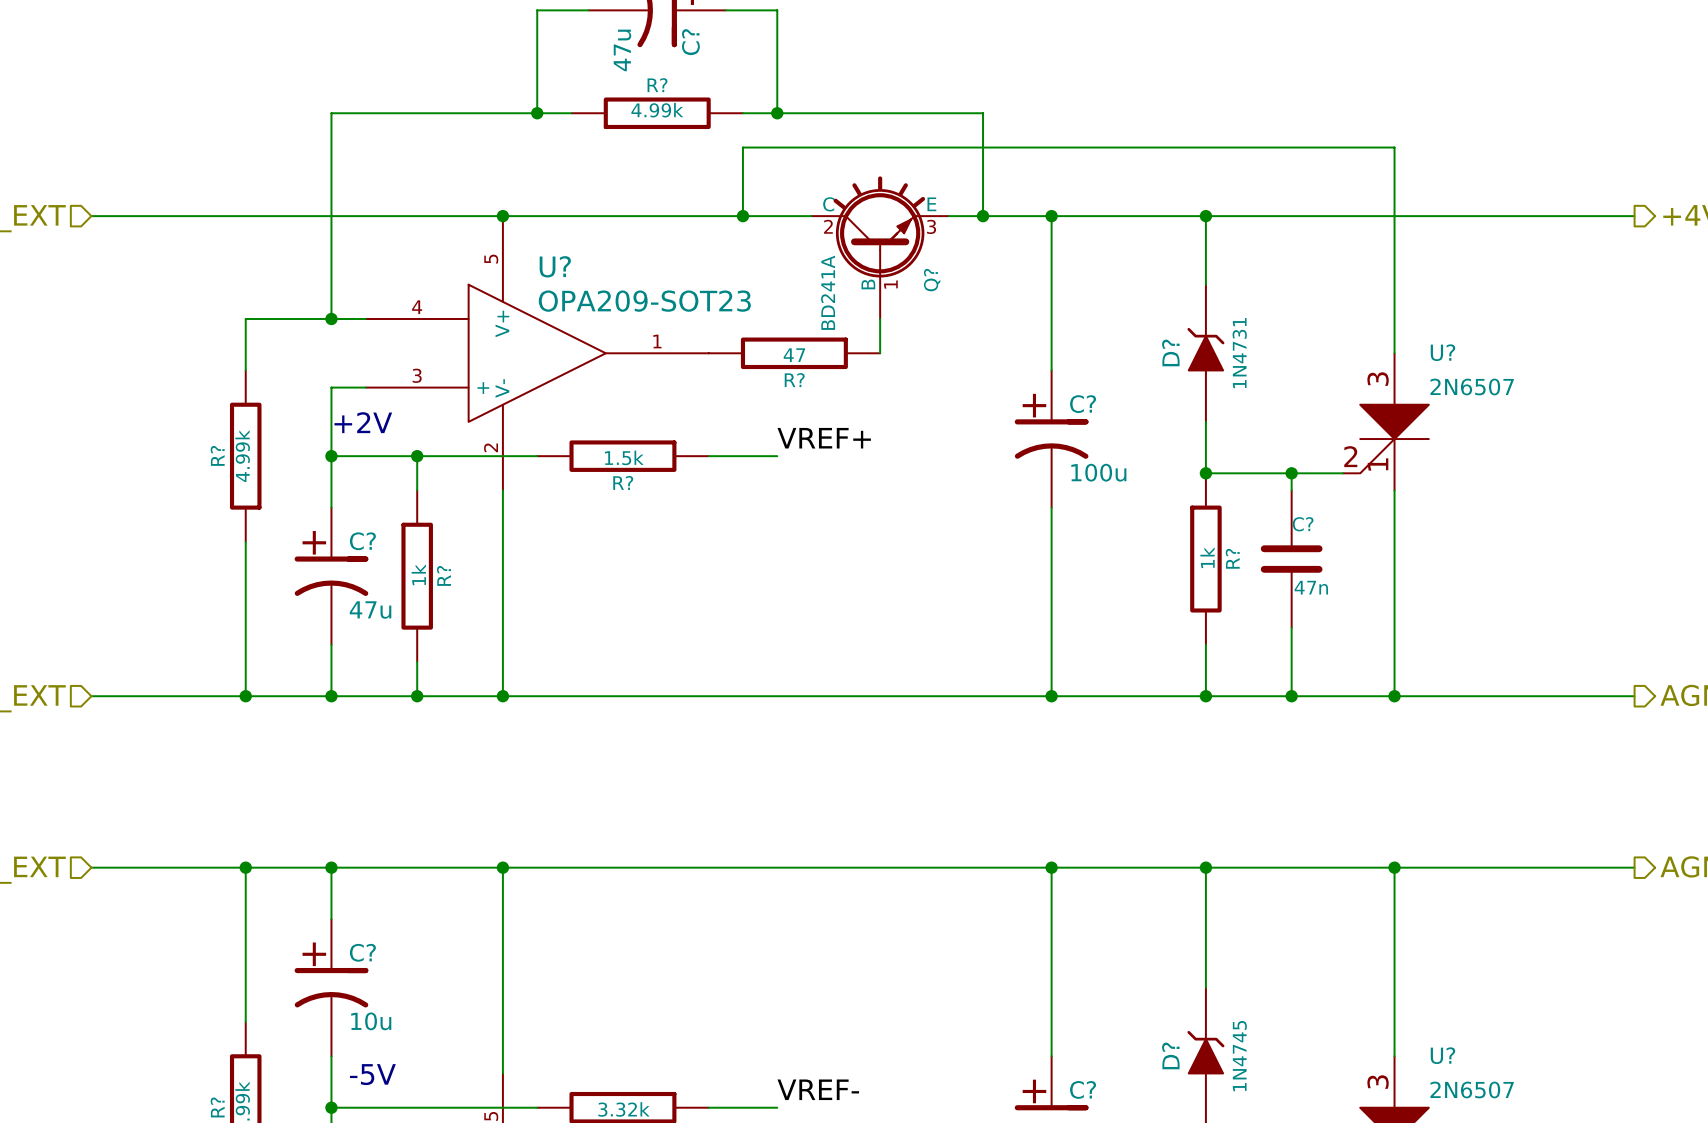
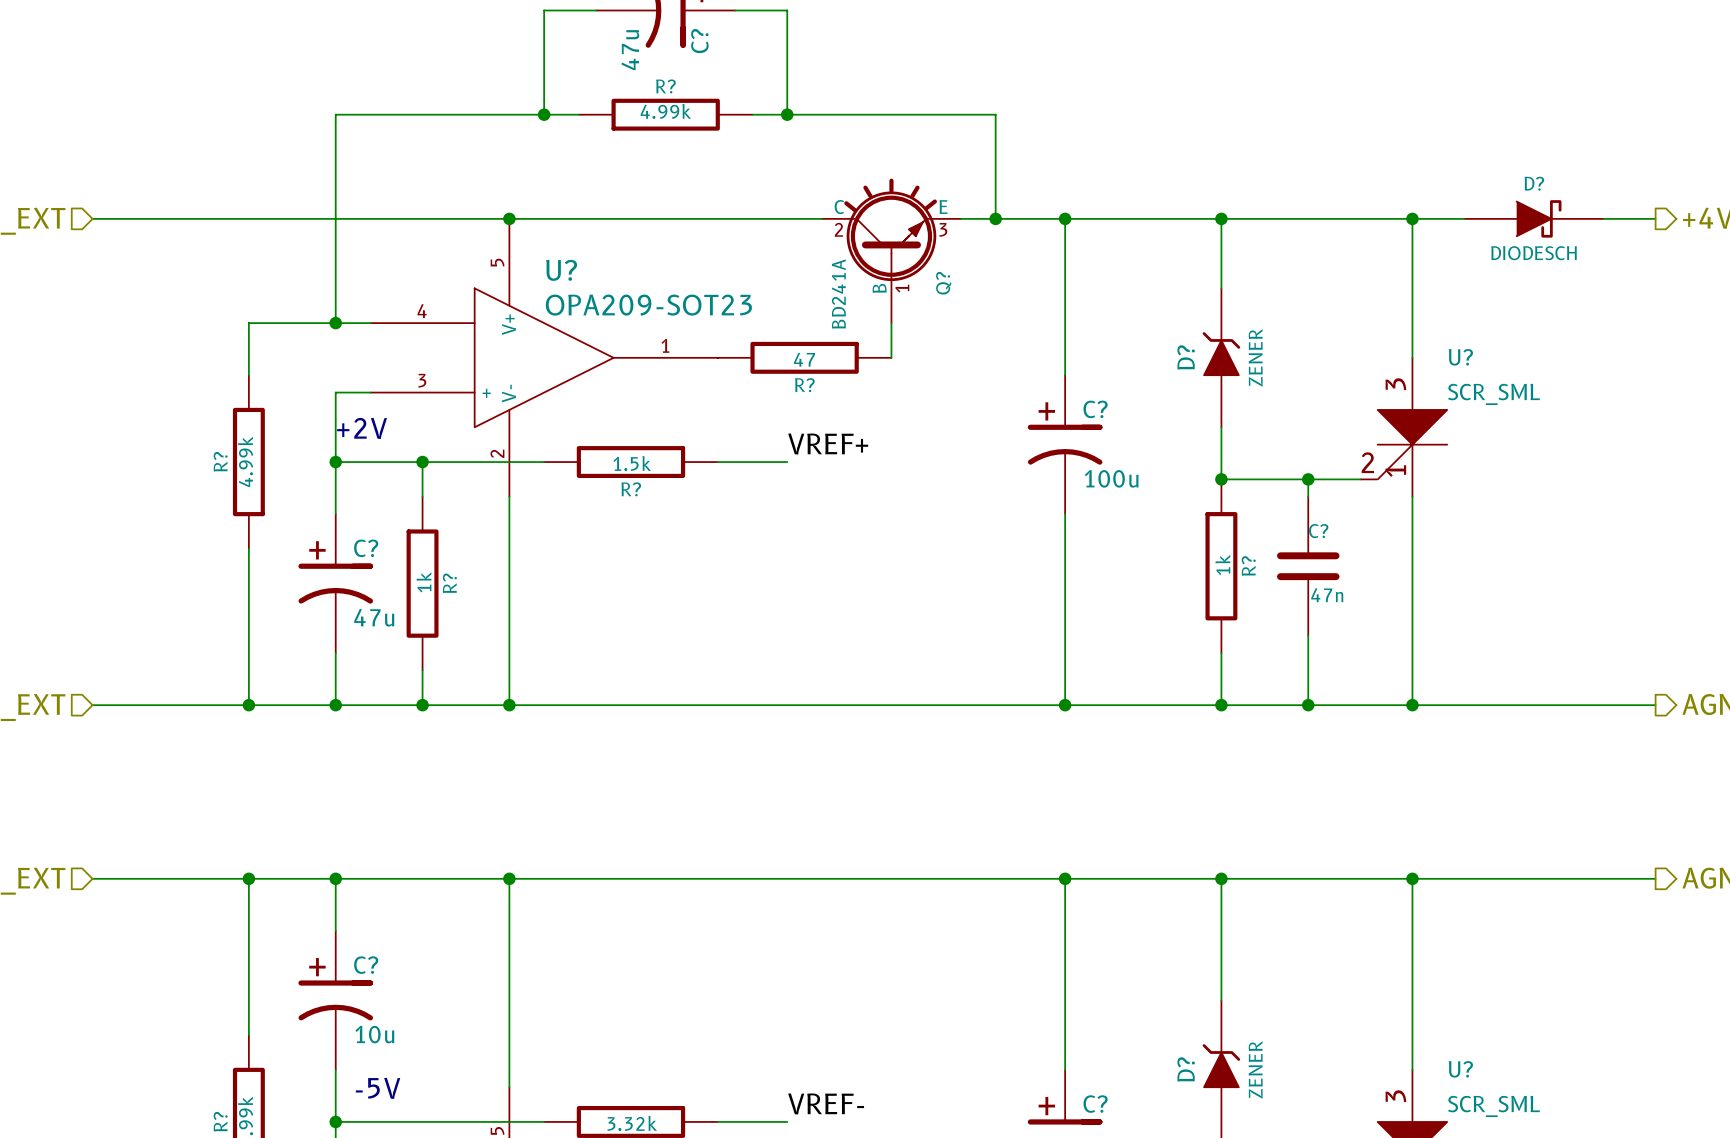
wire: (742, 216) (742, 147) (1394, 147) (1394, 216) -> none
junction: (742, 216) -> none
junction: none -> (1412, 218)
D?: none -> DIODESCH (1534, 218)
D? value: 1N4731 (1239, 353) -> ZENER (1255, 357)
U? value: 2N6507 (1472, 386) -> SCR_SML (1494, 394)
D? value: 1N4745 (1239, 1056) -> ZENER (1255, 1069)
U? value: 2N6507 (1472, 1089) -> SCR_SML (1494, 1106)

